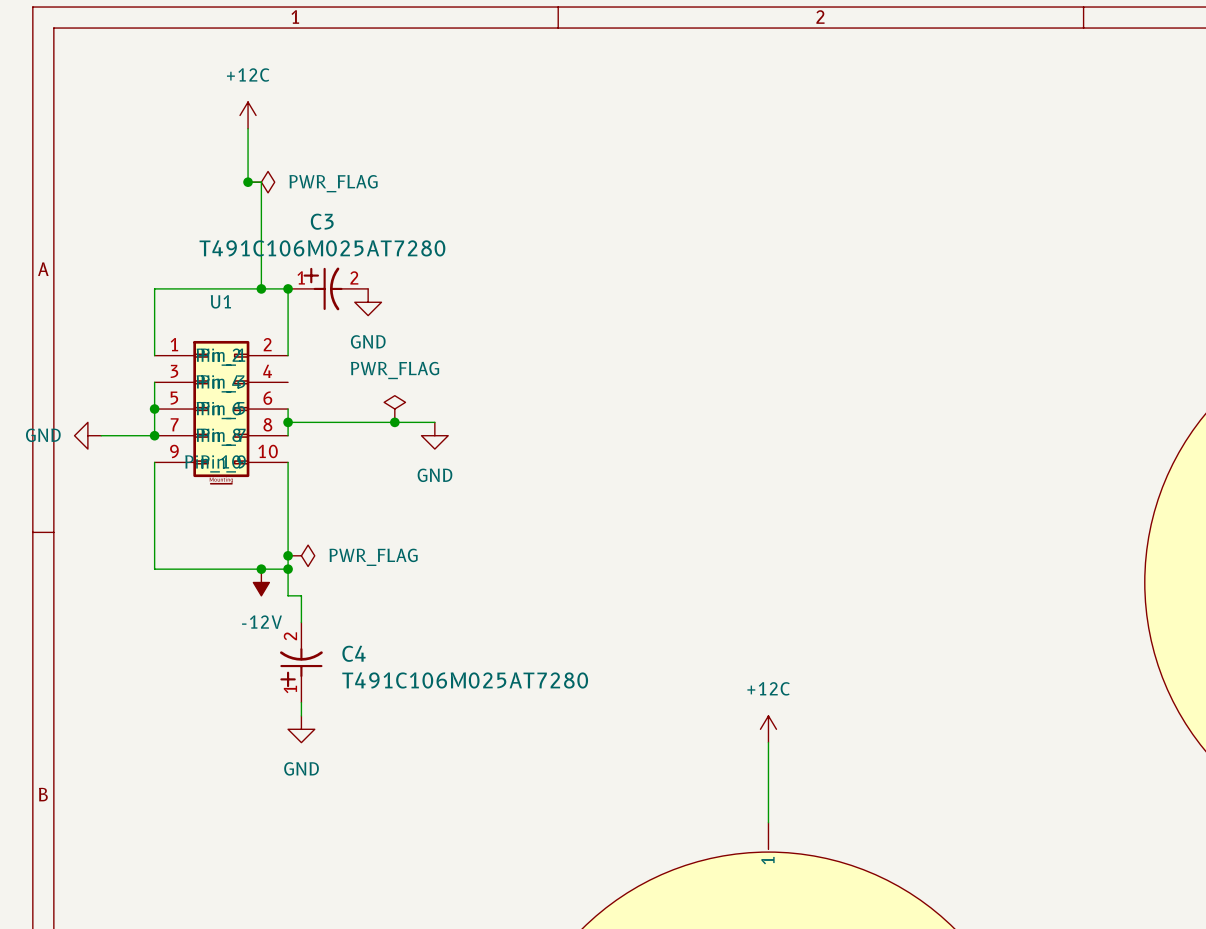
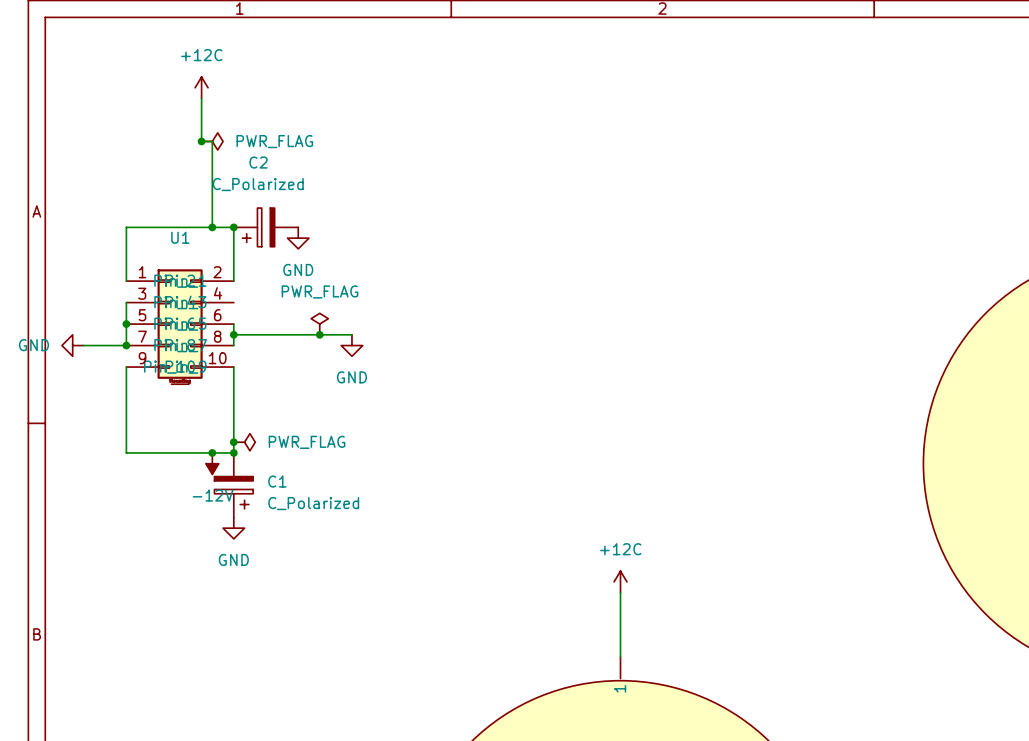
C3: T491C106M025AT7280 (328, 288) -> none
C2: none -> C_Polarized (266, 227)
wire: (288, 569) (288, 595) (301, 595) (301, 622) -> none
C1: none -> C_Polarized (233, 485)
C4: T491C106M025AT7280 (301, 662) -> none
wire: (301, 702) (301, 715) -> none
power symbol position: GND (301, 729) -> GND (233, 528)

